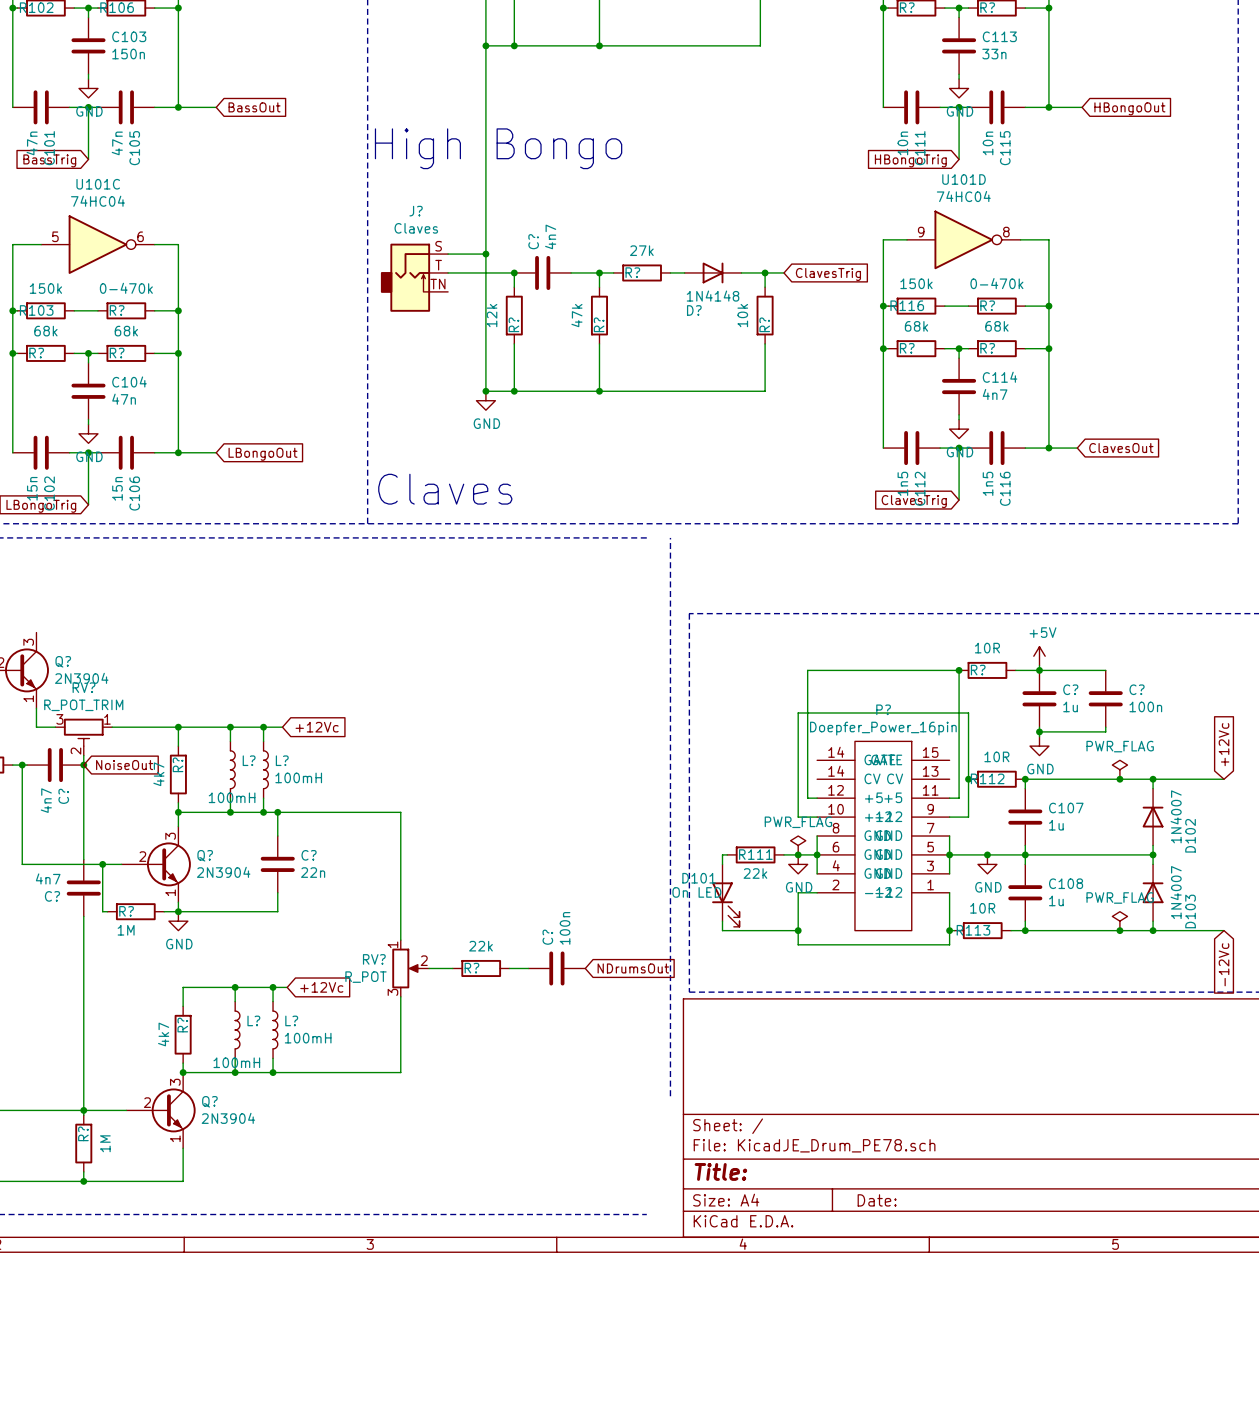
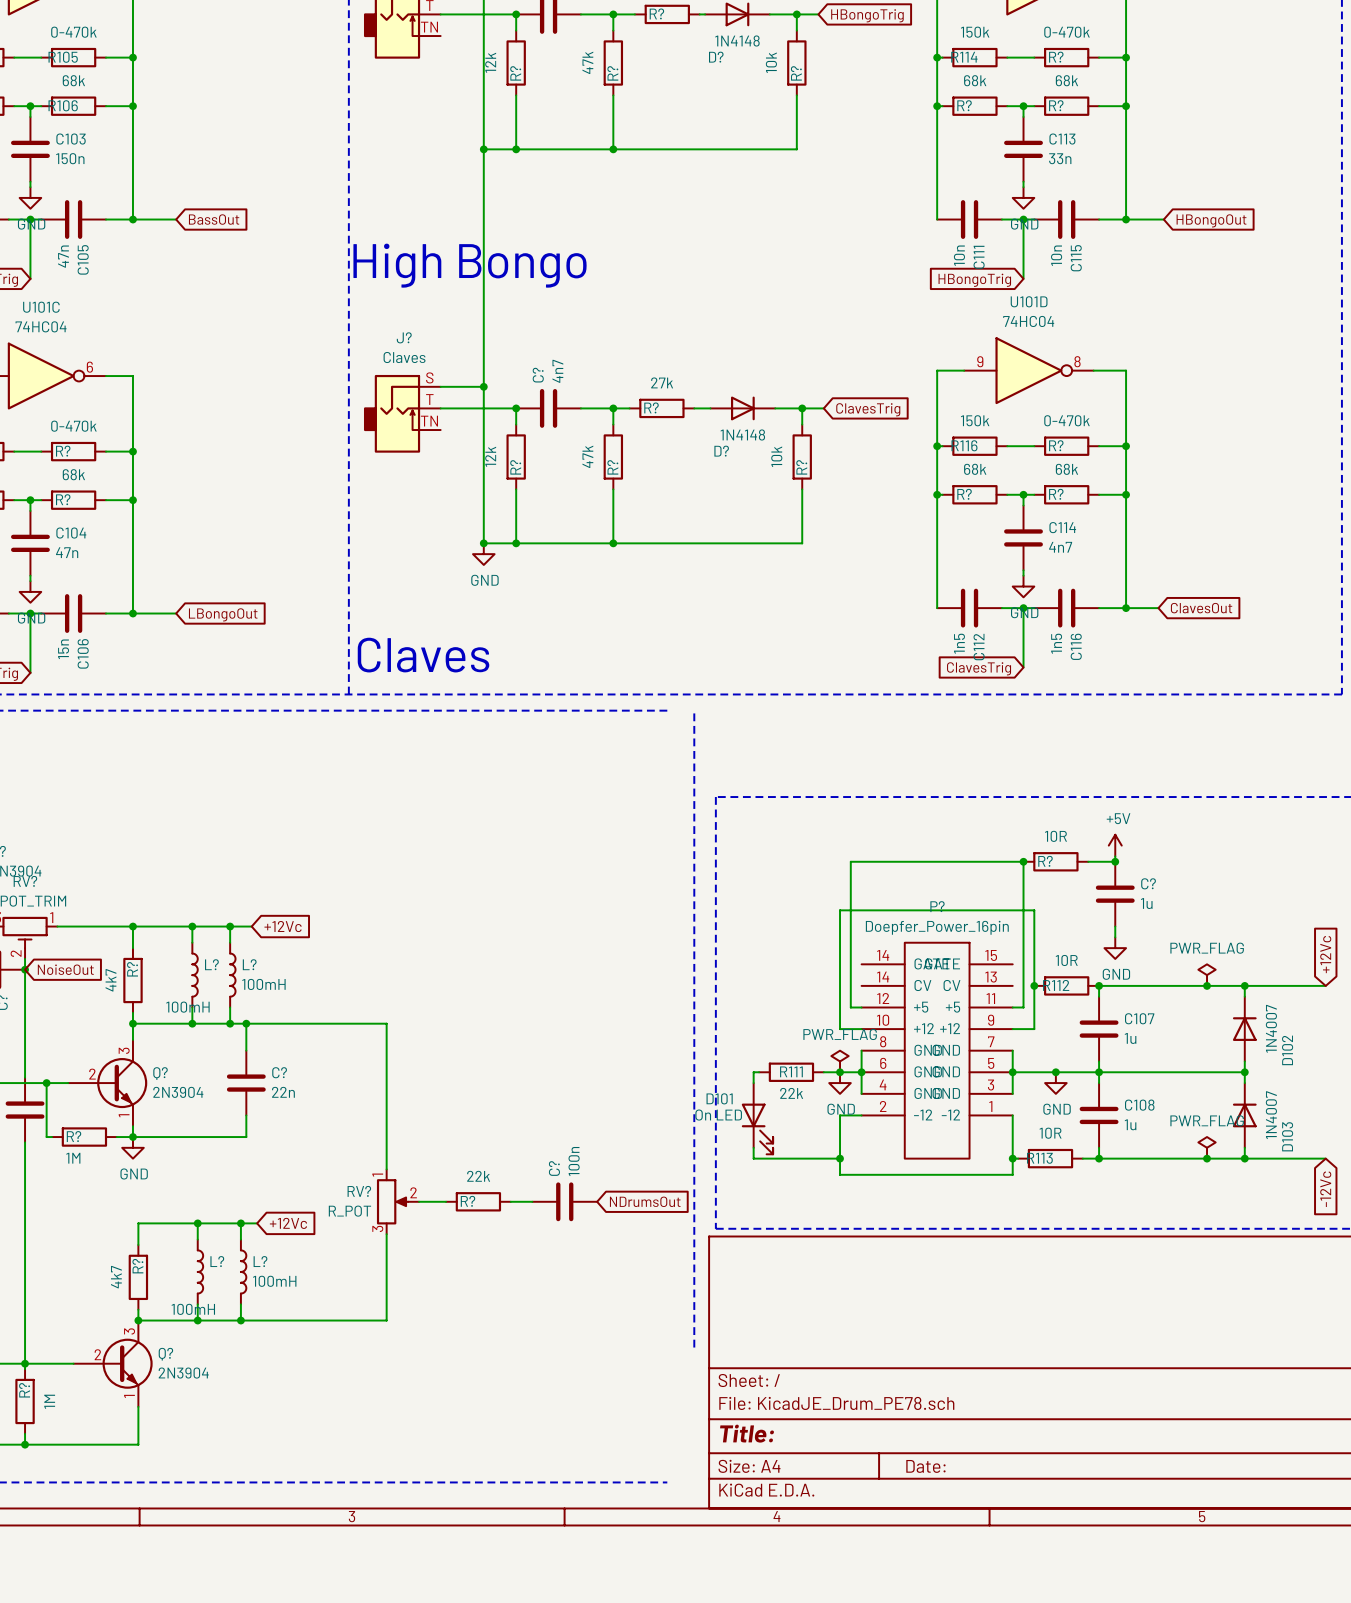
wire: (1039, 670) (1105, 670) -> none
C?: 100n (1105, 698) -> none
wire: (1105, 727) (1105, 731) (1039, 731) -> none
junction: (1039, 731) -> none

